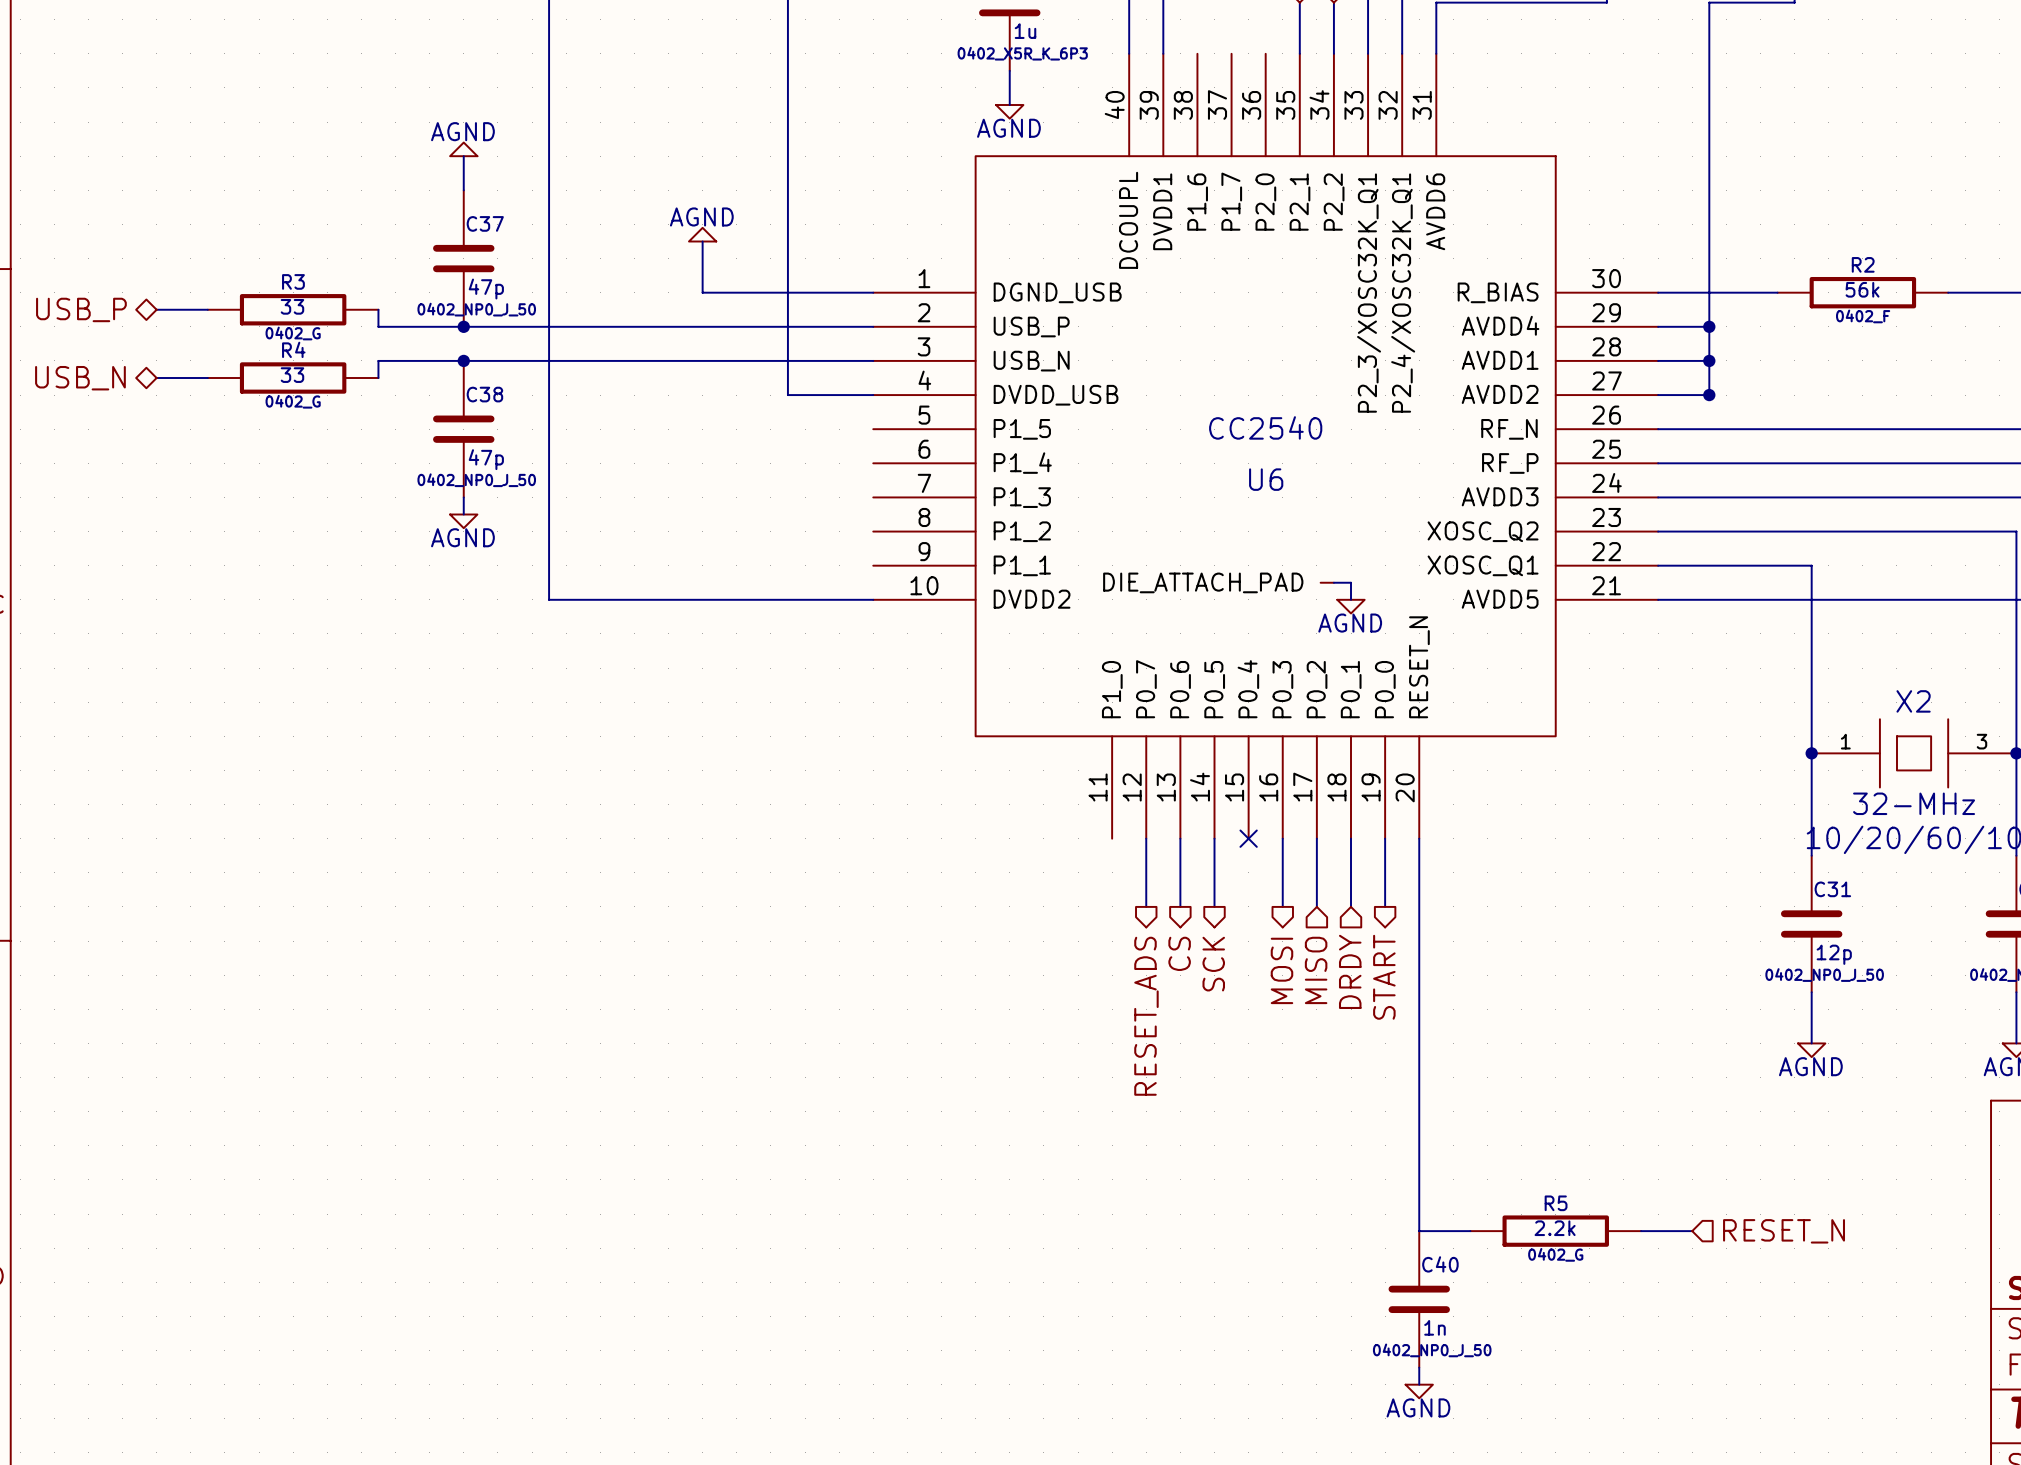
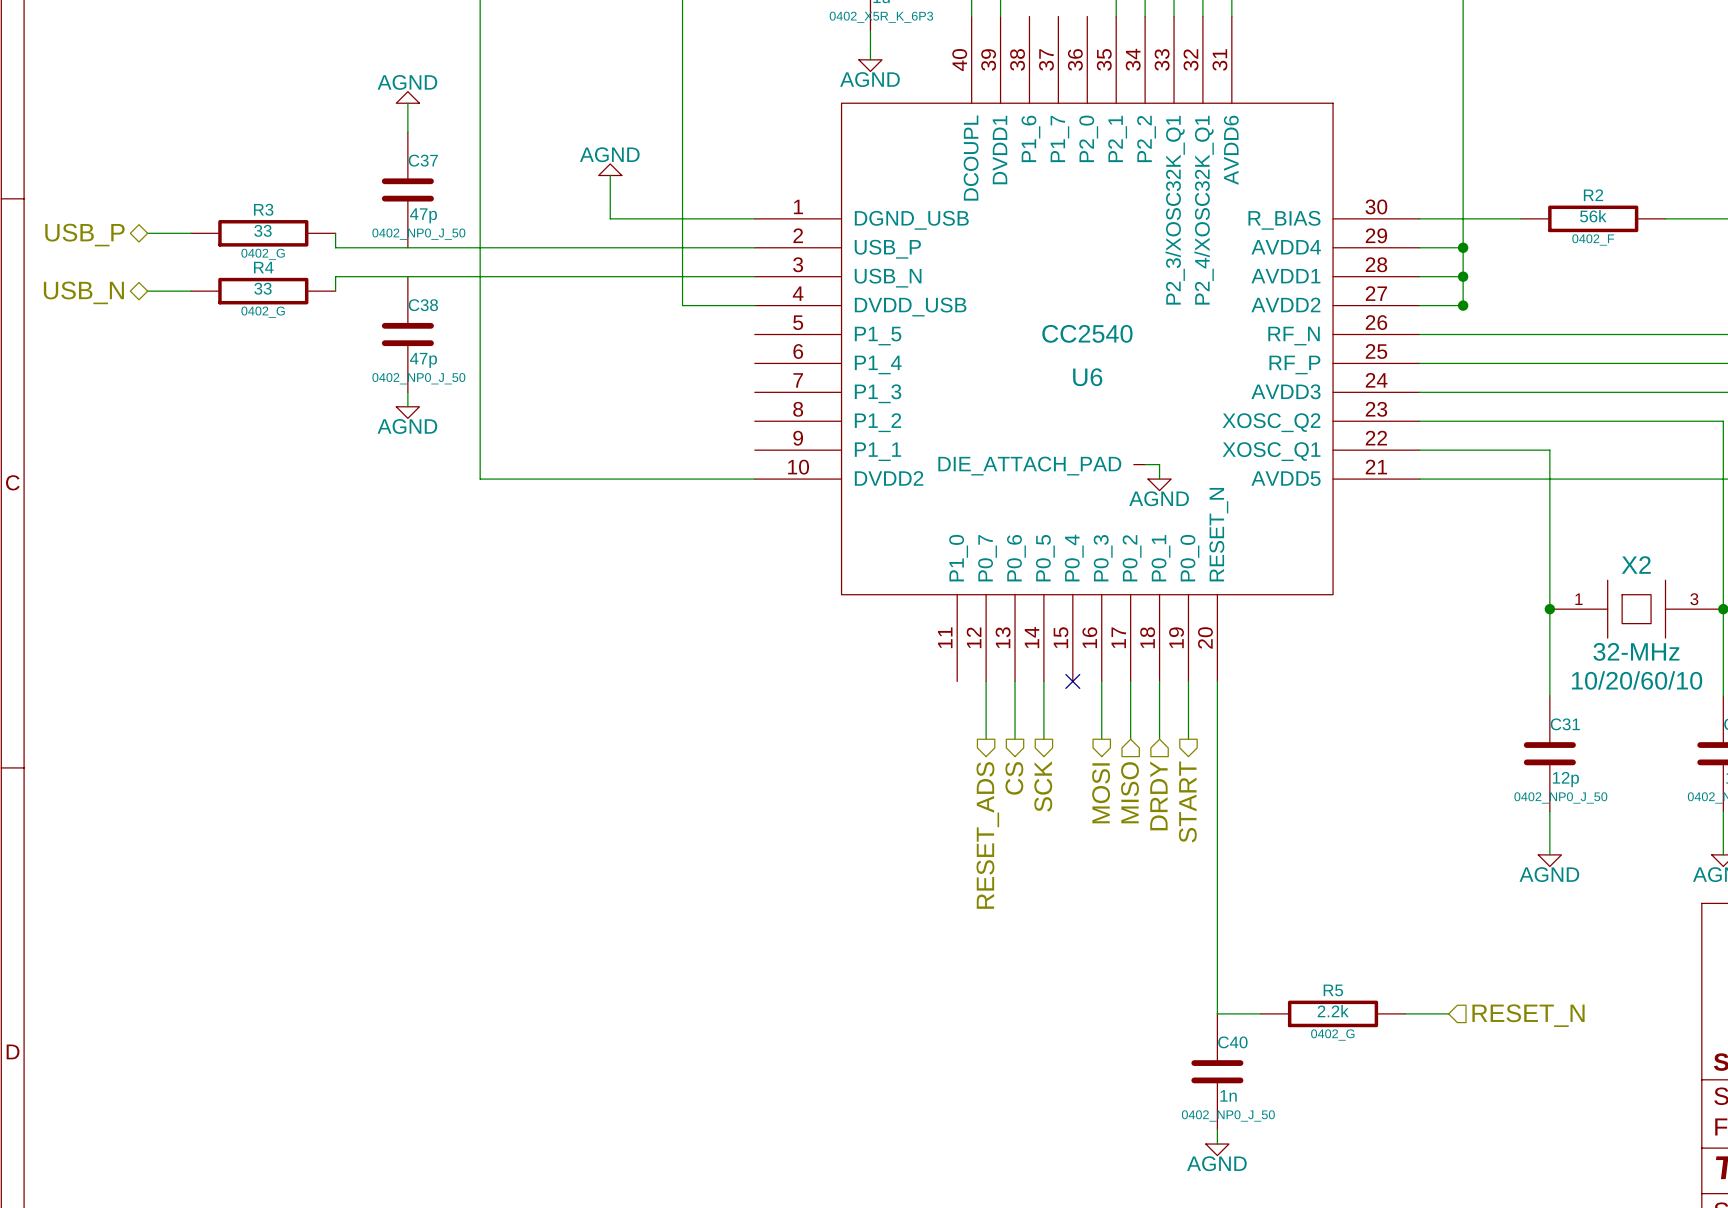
junction: (463, 326) -> none
junction: (463, 360) -> none

